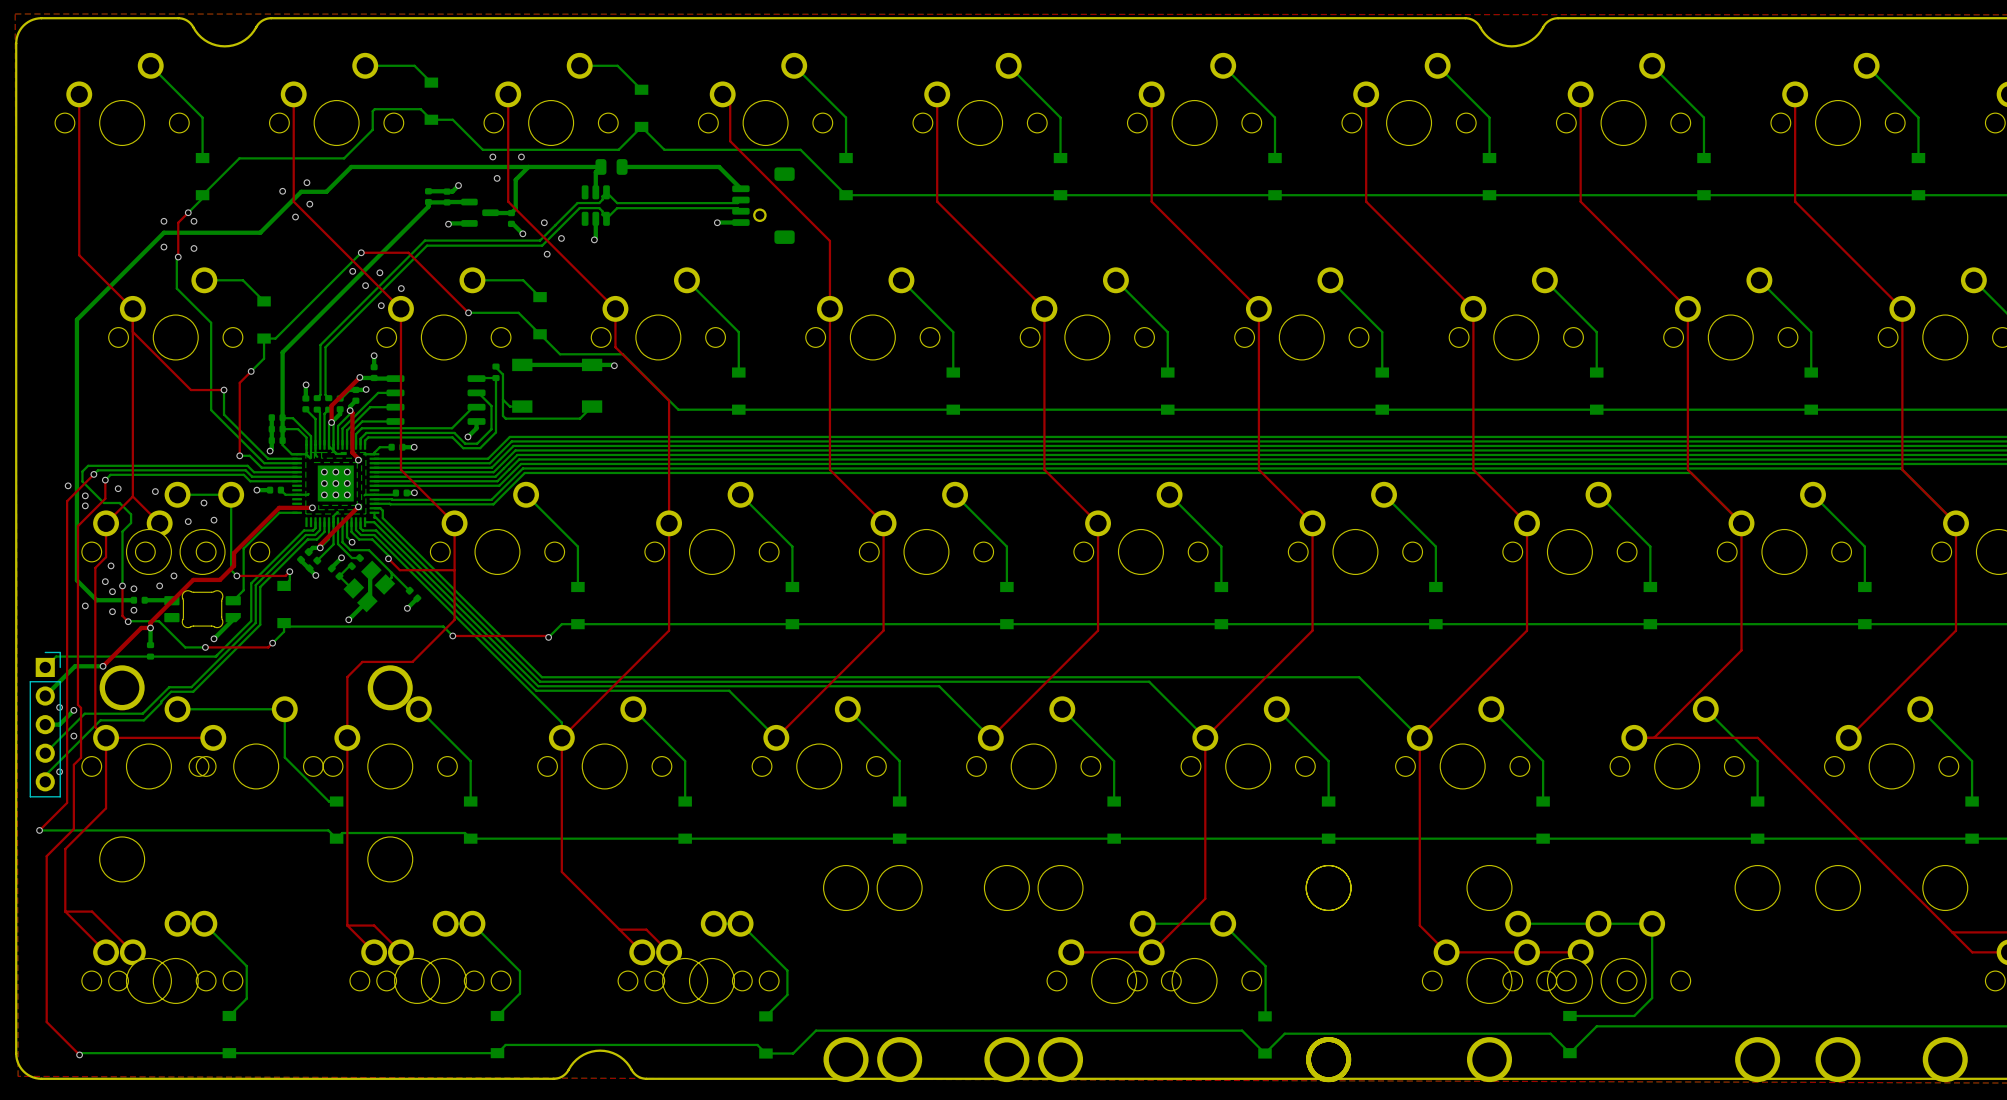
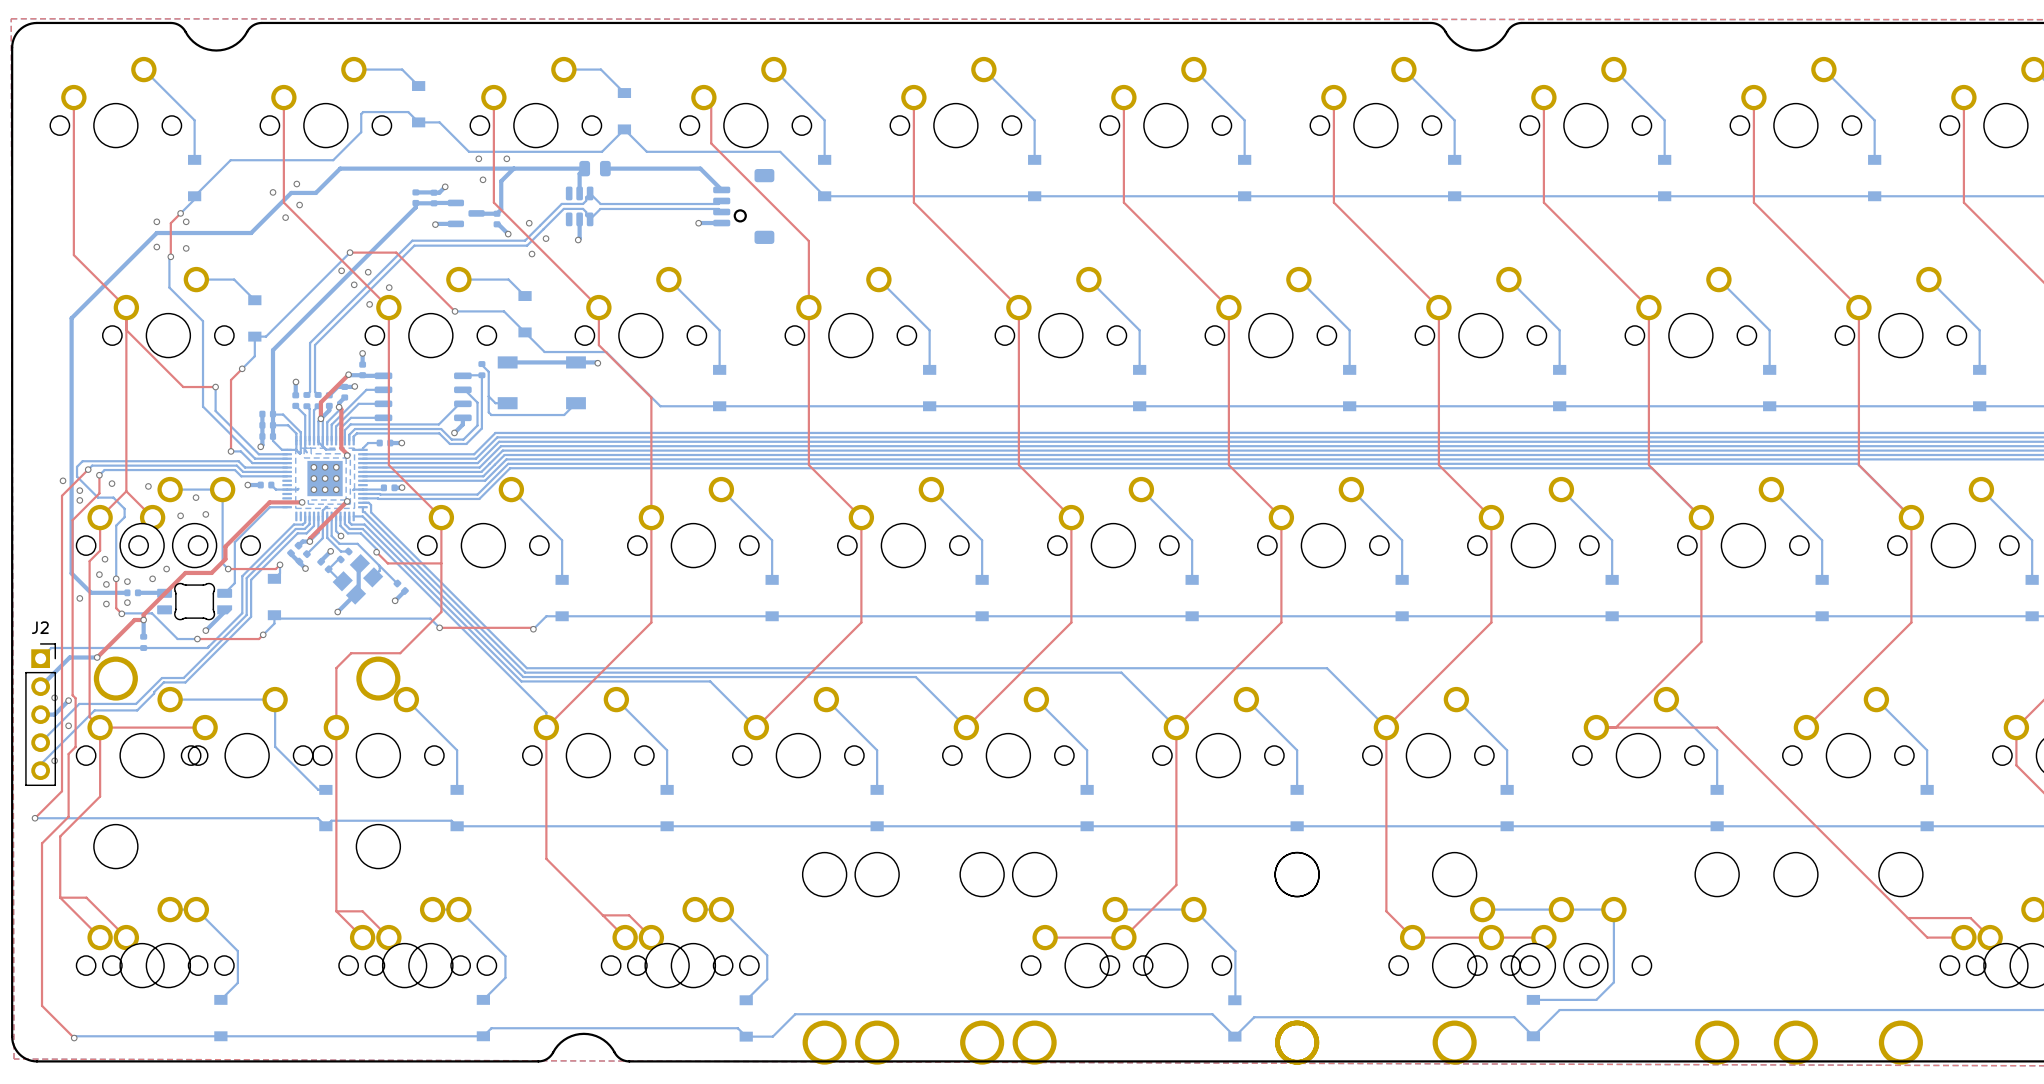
J2 name: none -> J2 (40, 627)

